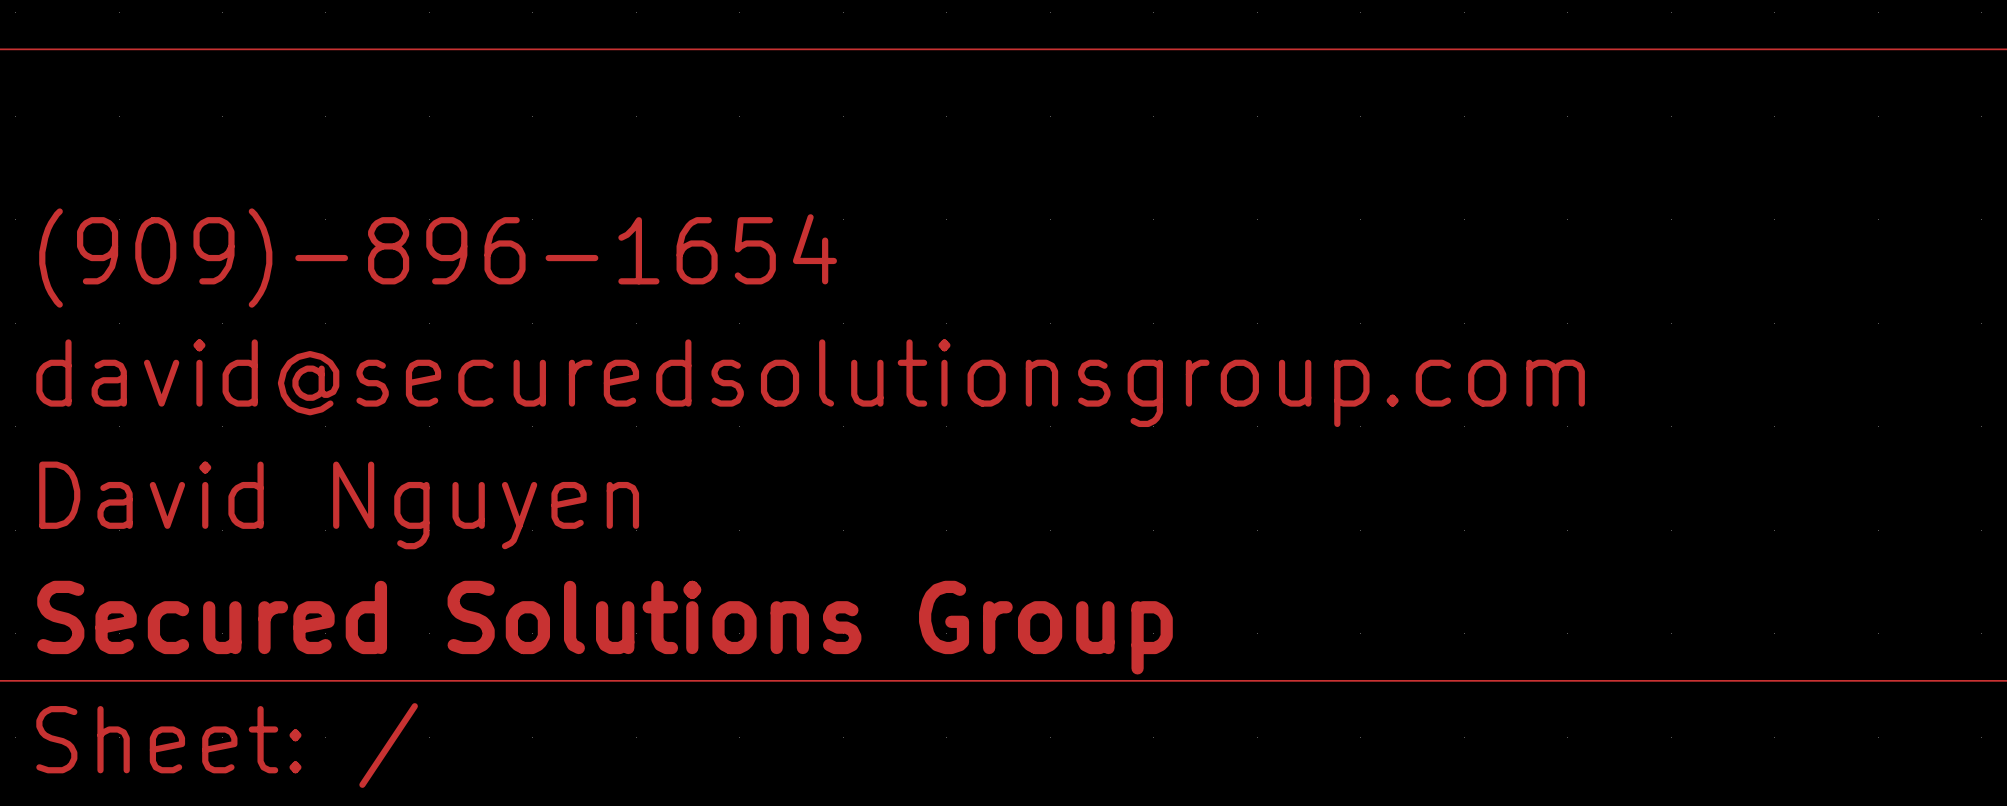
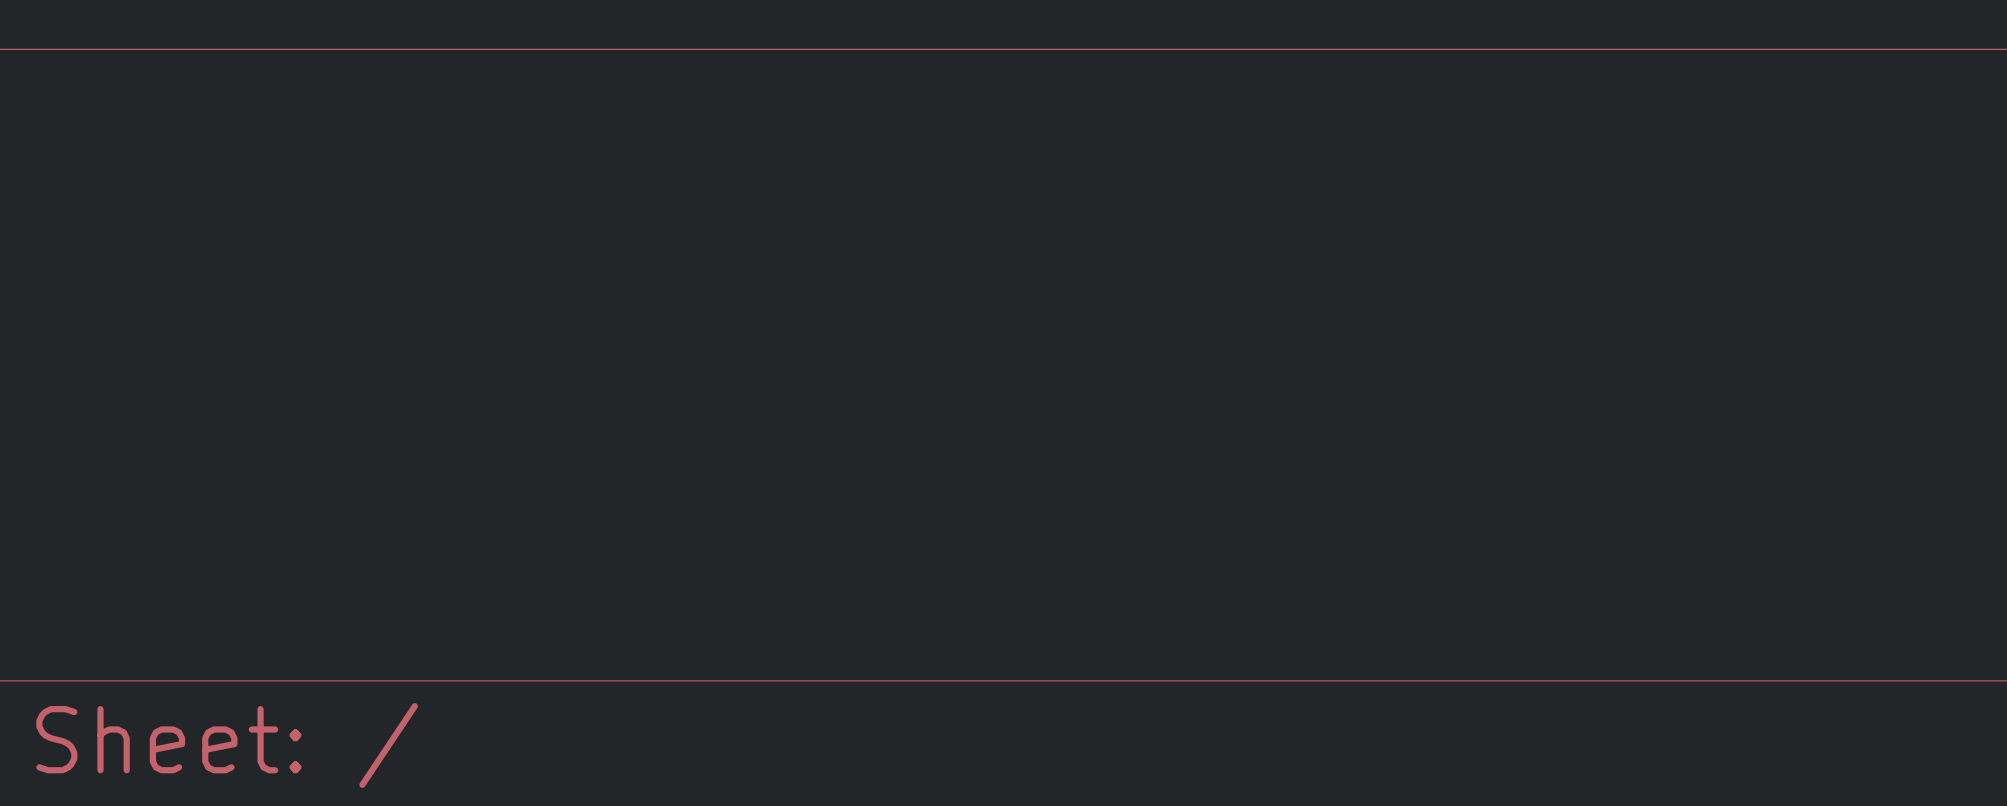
title block: (909)-896-1654 (438, 258) -> none
title block: david@securedsolutionsgroup.com (810, 383) -> none
title block: David Nguyen (339, 505) -> none
title block: Secured Solutions Group (605, 627) -> none

